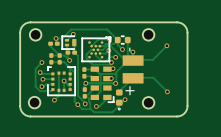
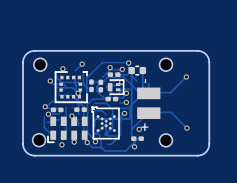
via: none -> (128, 62)
via: none -> (110, 67)
track: (117, 40) (107, 29) (71, 29) (62, 38) (56, 38) (57, 43) -> none
part rotation: 0° (69, 42) -> 180° (116, 87)
part position: (69, 42) -> (116, 87)
part: (53, 43) -> none
track: none -> (110, 74) (102, 82) (91, 82)
part: none -> (114, 74)
track: none -> (50, 81) (53, 84) (62, 82) (78, 82) (80, 84)
part rotation: 0° (96, 49) -> 90° counterclockwise (105, 122)
part position: (96, 49) -> (105, 122)
via: (122, 49) -> none
part: (71, 52) -> none
via: (132, 52) -> none
part: none -> (91, 85)
part: none -> (100, 86)
track: none -> (110, 87) (110, 97) (108, 99) (93, 99) (89, 103) (52, 101) (45, 107)
via: (115, 57) -> none
part: (51, 58) -> none
part: (59, 58) -> none
via: none -> (126, 93)
track: none -> (86, 94) (86, 78) (102, 62) (128, 62) (128, 68) (131, 71) (131, 136) (134, 139) (134, 146)
track: (41, 62) (35, 68) (35, 86) (40, 91) (52, 89) -> none
via position: (41, 62) -> (50, 81)
via: (111, 62) -> none
part: none -> (111, 99)
part: (84, 72) -> none
part: none -> (57, 109)
part: none -> (80, 109)
track: none -> (125, 113) (120, 116) (120, 134) (118, 135) (108, 135) (106, 133) (106, 127)
track: none -> (44, 116) (44, 127) (52, 135)
part rotation: 0° (61, 81) -> 90° clockwise (71, 87)
part position: (61, 81) -> (71, 87)
via: (85, 83) -> none
via: (115, 83) -> none
part rotation: 0° (102, 84) -> 90° clockwise (67, 129)
part position: (102, 84) -> (67, 129)
via: (41, 86) -> none
part footprint: [115, 89, 123, 111] -> [131, 136, 144, 141]
part: (84, 92) -> none
via: none -> (139, 129)
via: (125, 99) -> none
via: (54, 100) -> none
via: none -> (74, 142)
via: none -> (61, 144)
via: (96, 106) -> none
via: none -> (134, 146)

